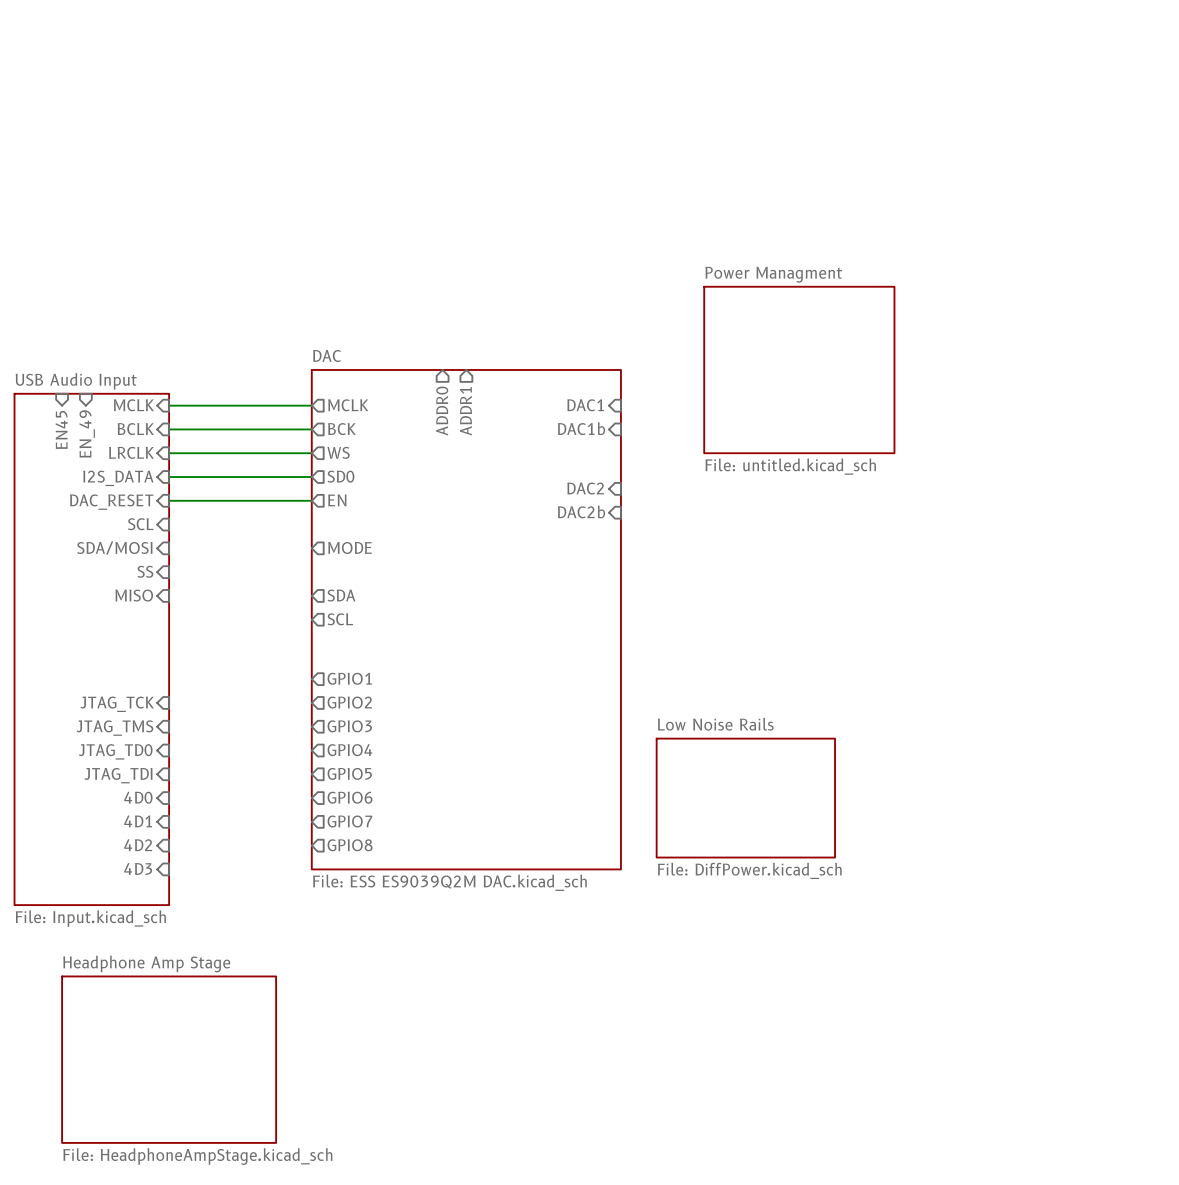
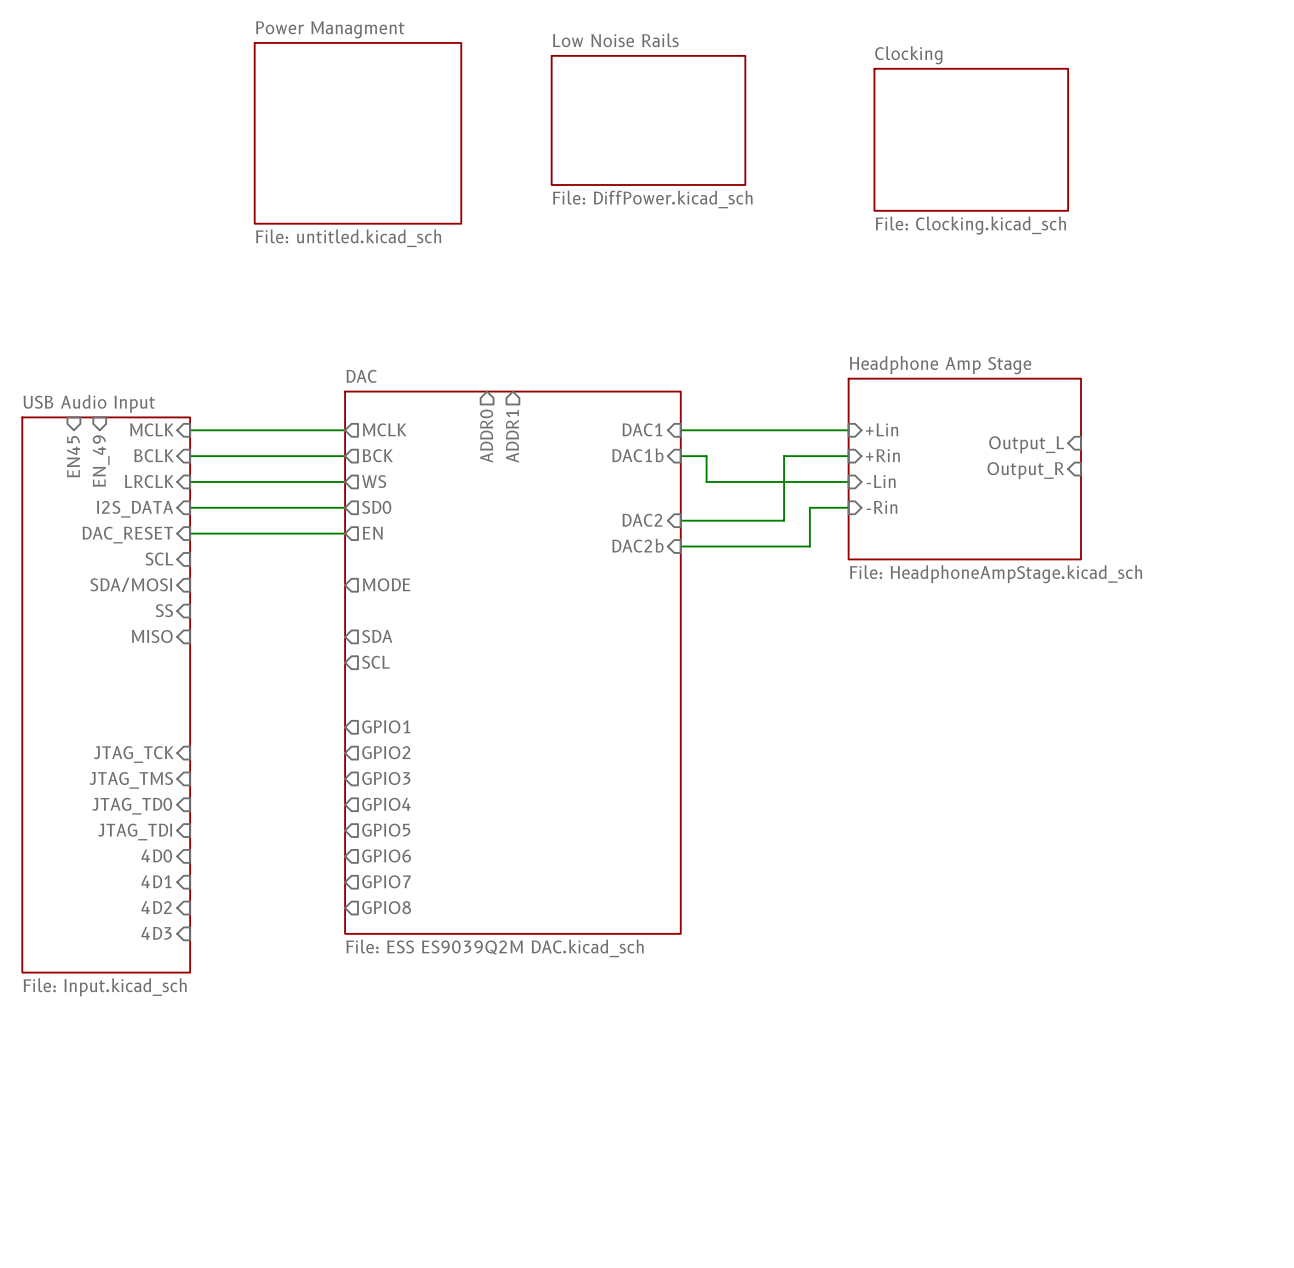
sheet Low Noise Rails: none -> File: DiffPower.kicad_sch (648, 120)
sheet Power Managment: none -> File: untitled.kicad_sch (357, 133)
sheet Clocking: none -> File: Clocking.kicad_sch (971, 139)
sheet Power Managment: File: untitled.kicad_sch (799, 369) -> none
wire: none -> (680, 430) (848, 430)
sheet pin: none -> +Lin (882, 429)
sheet pin: none -> Output_L (1026, 444)
wire: none -> (680, 456) (706, 456) (706, 481) (848, 481)
wire: none -> (848, 456) (784, 456) (784, 520) (680, 520)
sheet pin: none -> +Rin (882, 455)
sheet Headphone Amp Stage: none -> File: HeadphoneAmpStage.kicad_sch (964, 469)
sheet pin: none -> Output_R (1025, 470)
sheet pin: none -> -Lin (881, 481)
sheet pin: none -> -Rin (882, 507)
wire: none -> (848, 507) (809, 507) (809, 546) (680, 546)
sheet Low Noise Rails: File: DiffPower.kicad_sch (745, 798) -> none
sheet Headphone Amp Stage: File: HeadphoneAmpStage.kicad_sch (169, 1059) -> none

